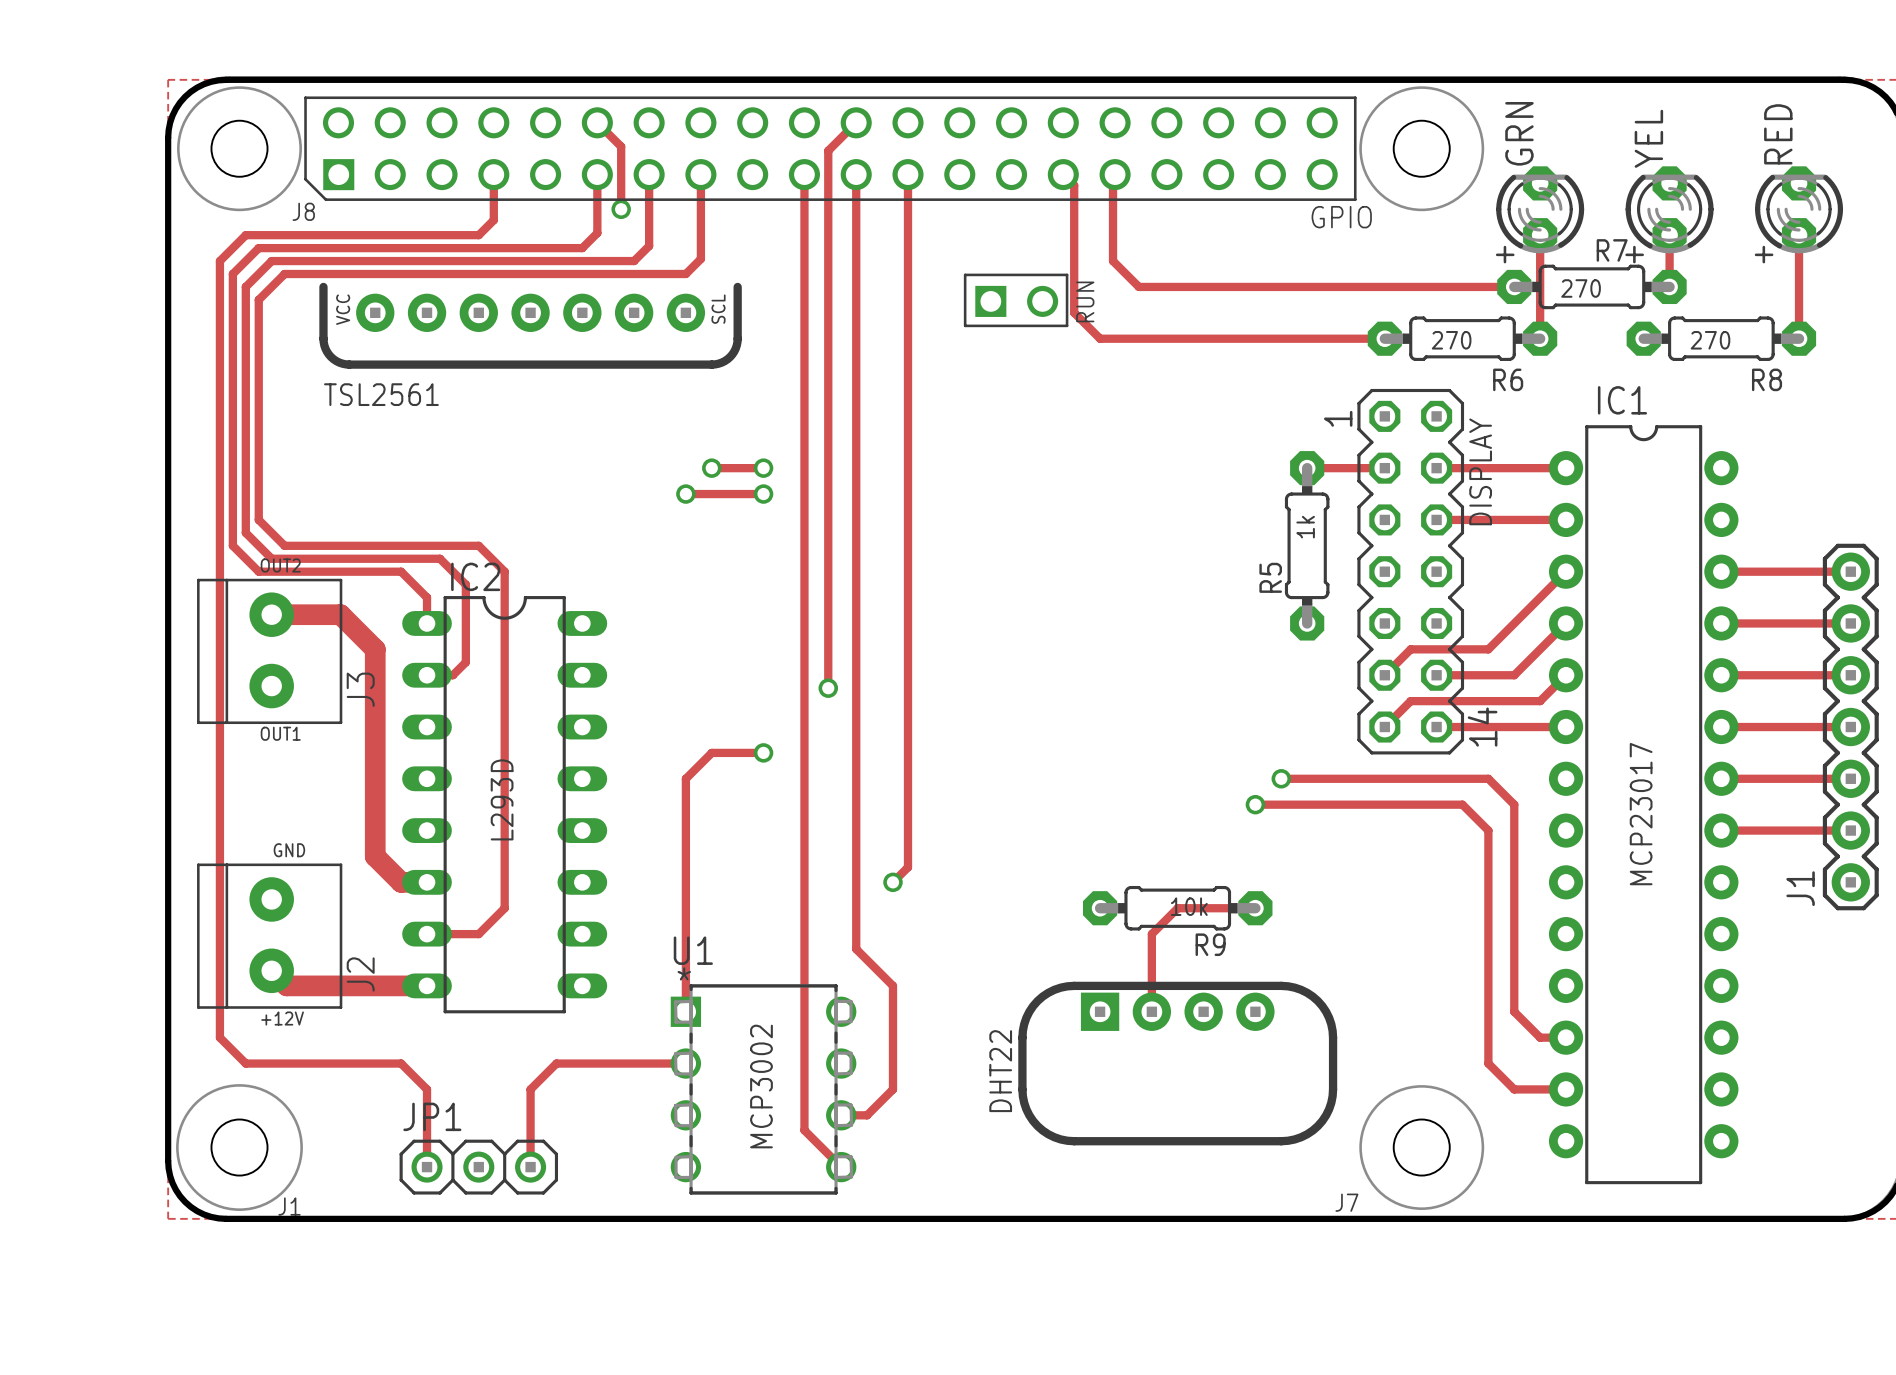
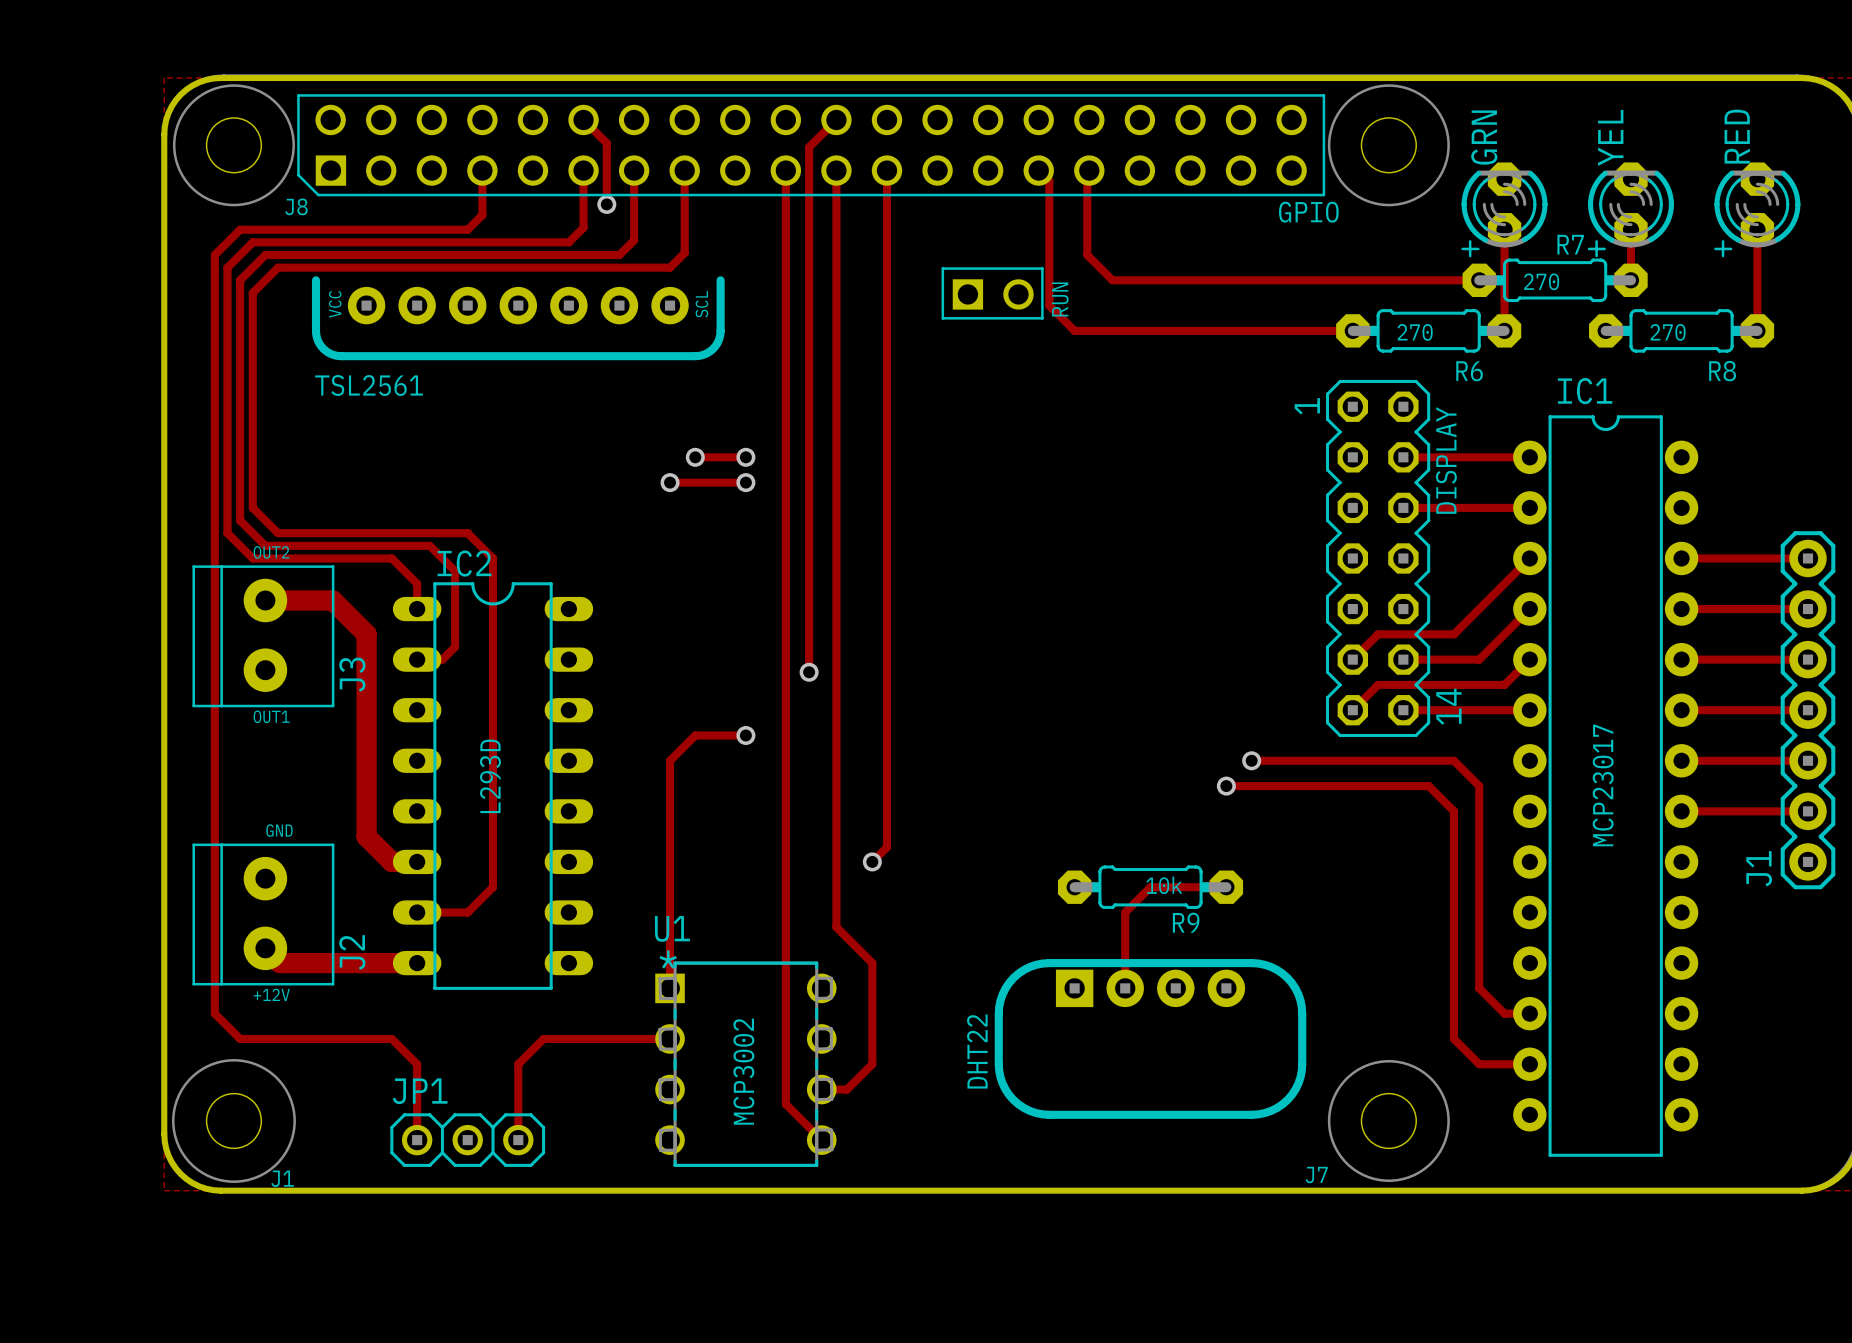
track: (1307, 468) (1384, 468) -> none
R5: 1k (1307, 545) -> none

